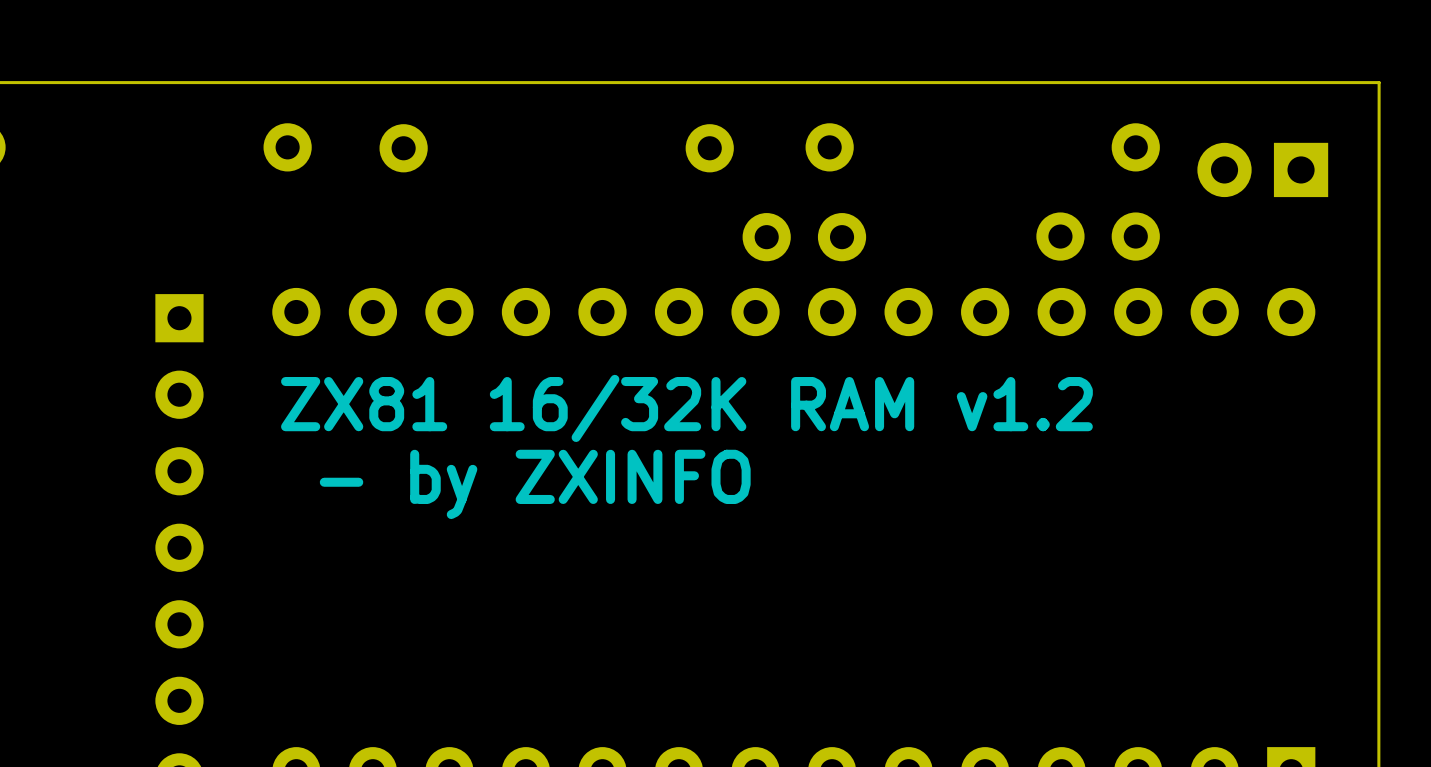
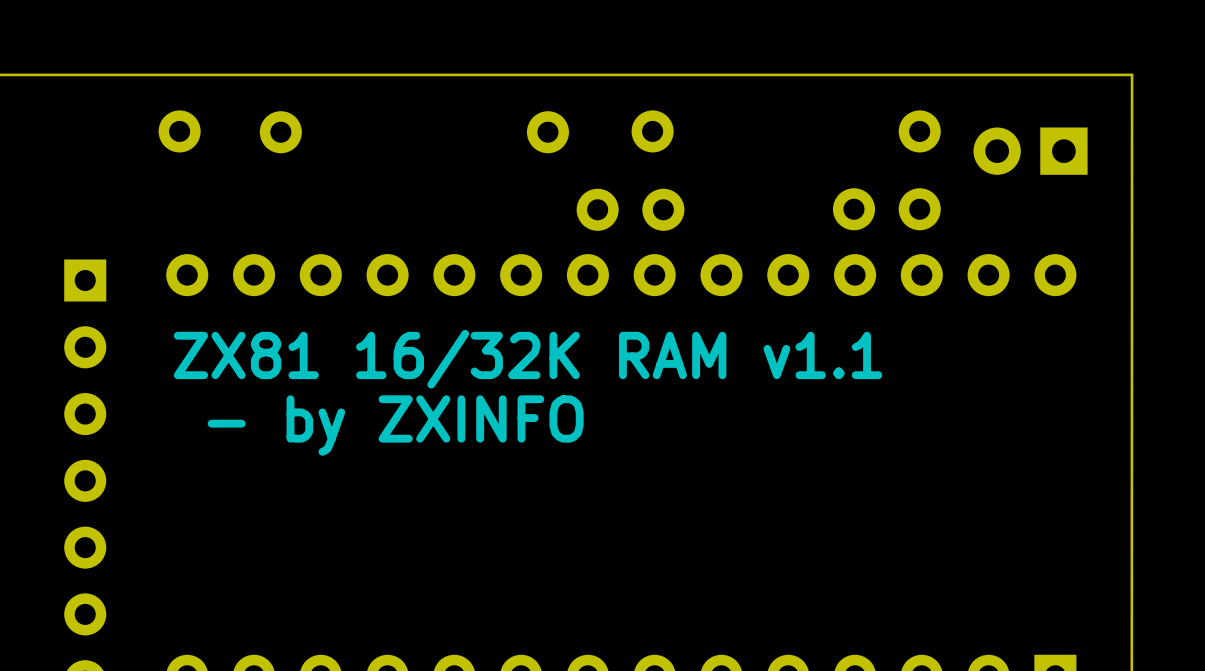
text: ZX81 16/32K RAM v1.2 (686, 408) -> ZX81 16/32K RAM v1.1 (528, 359)

